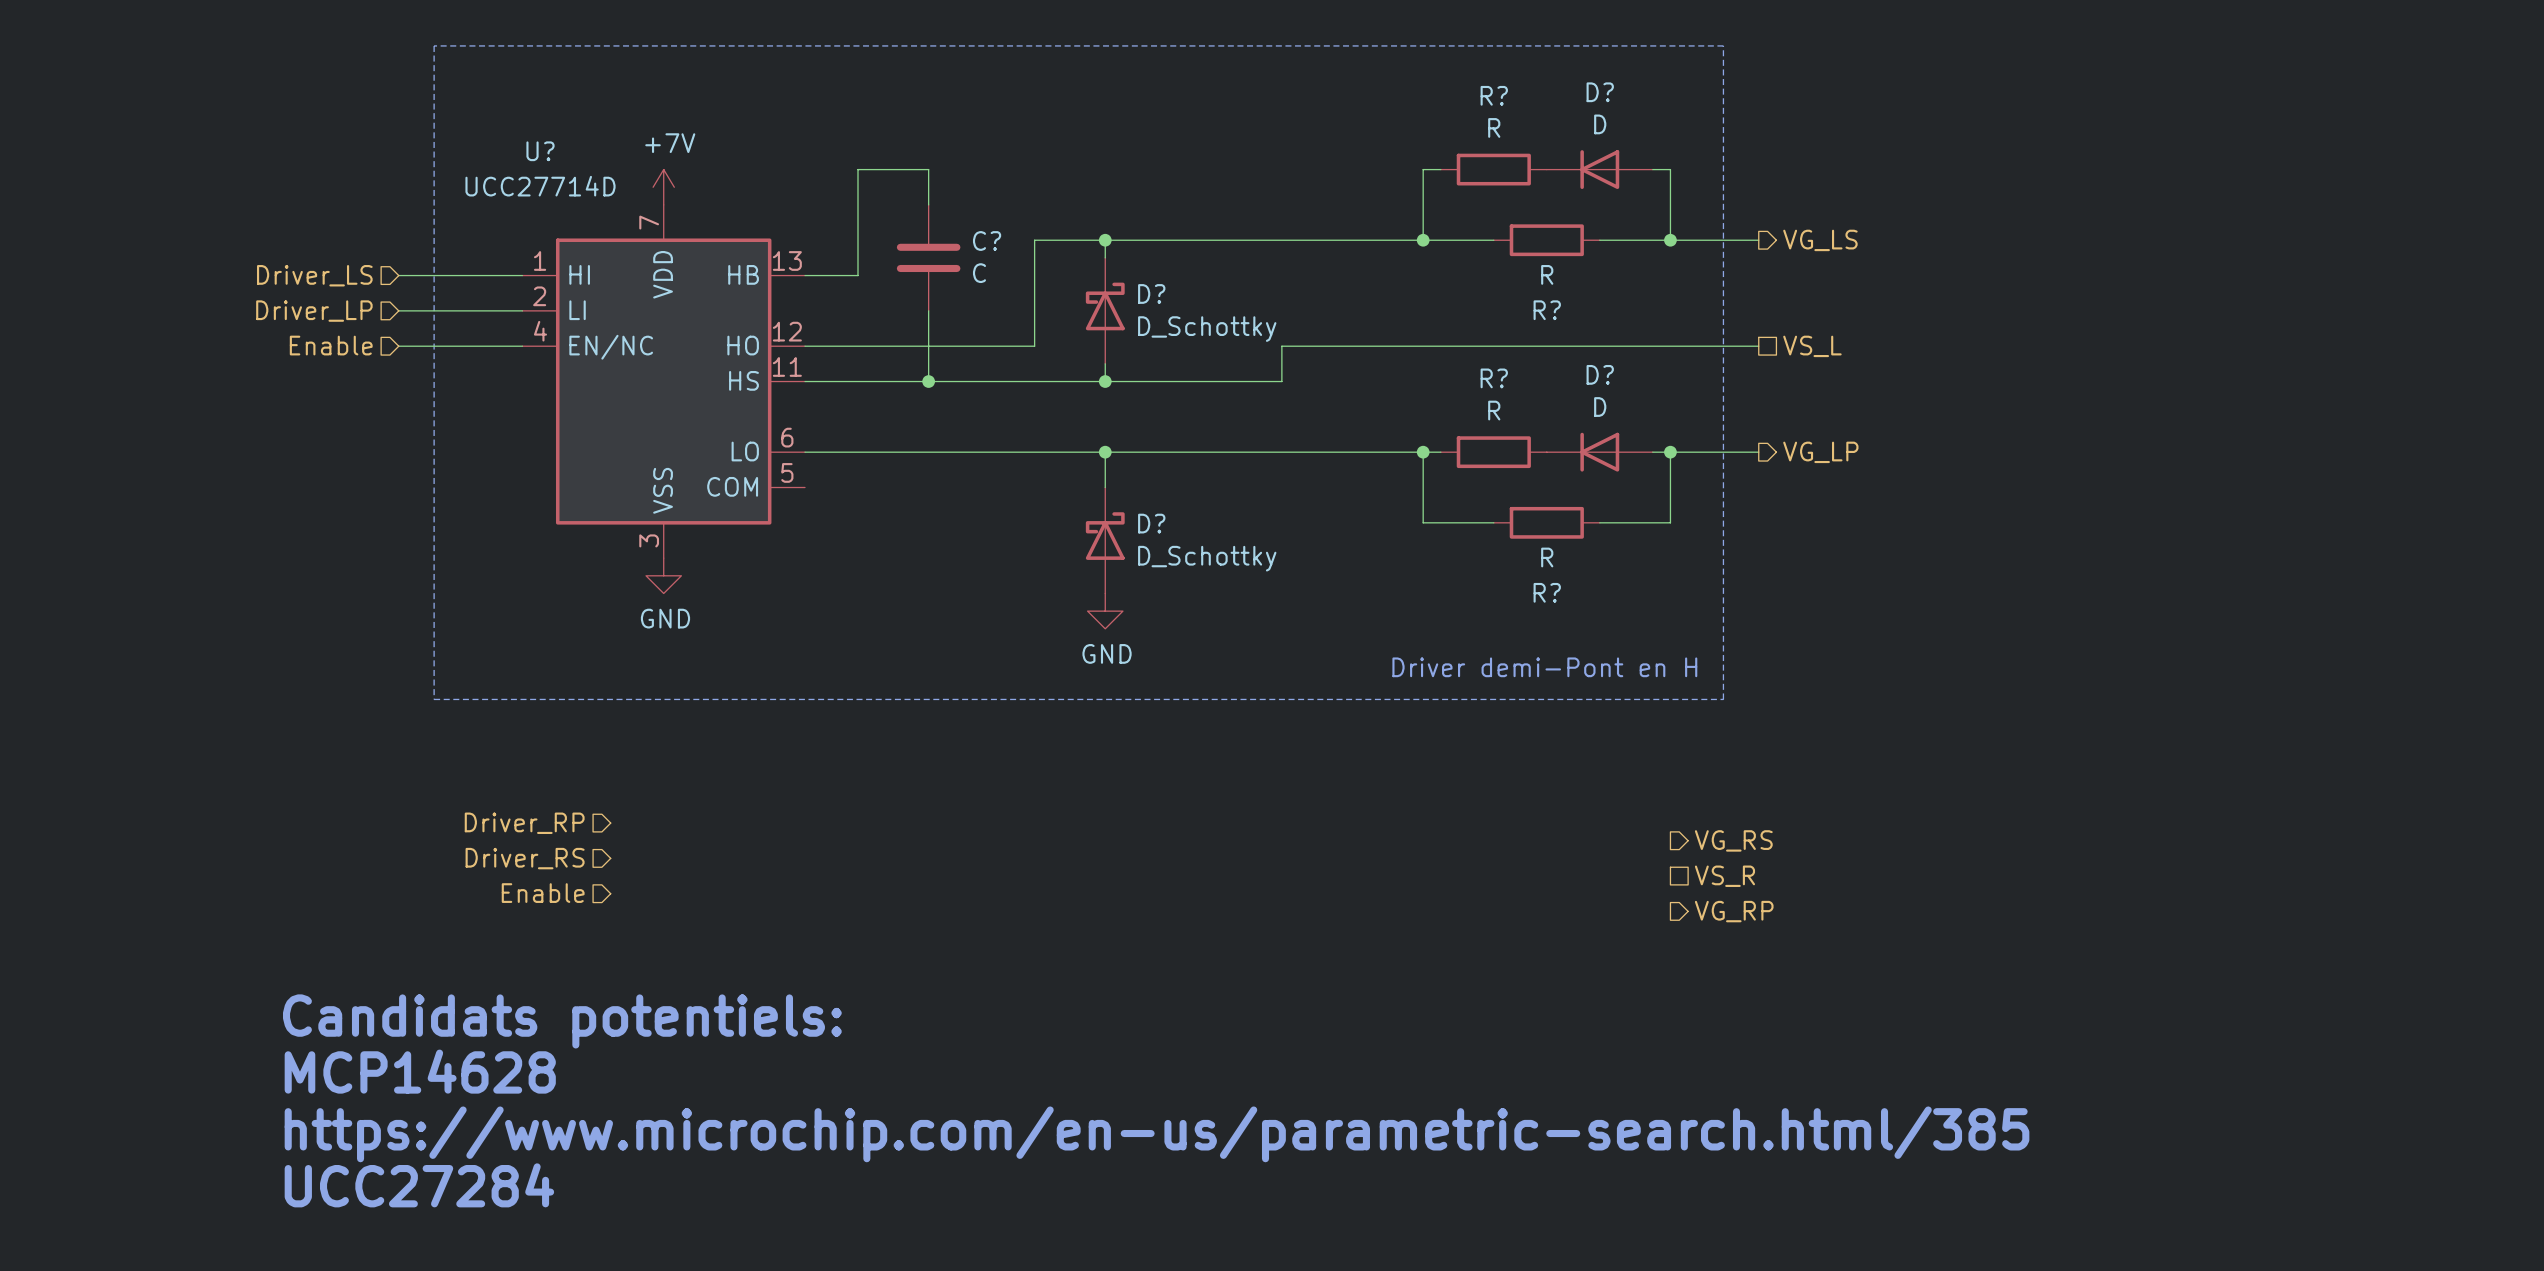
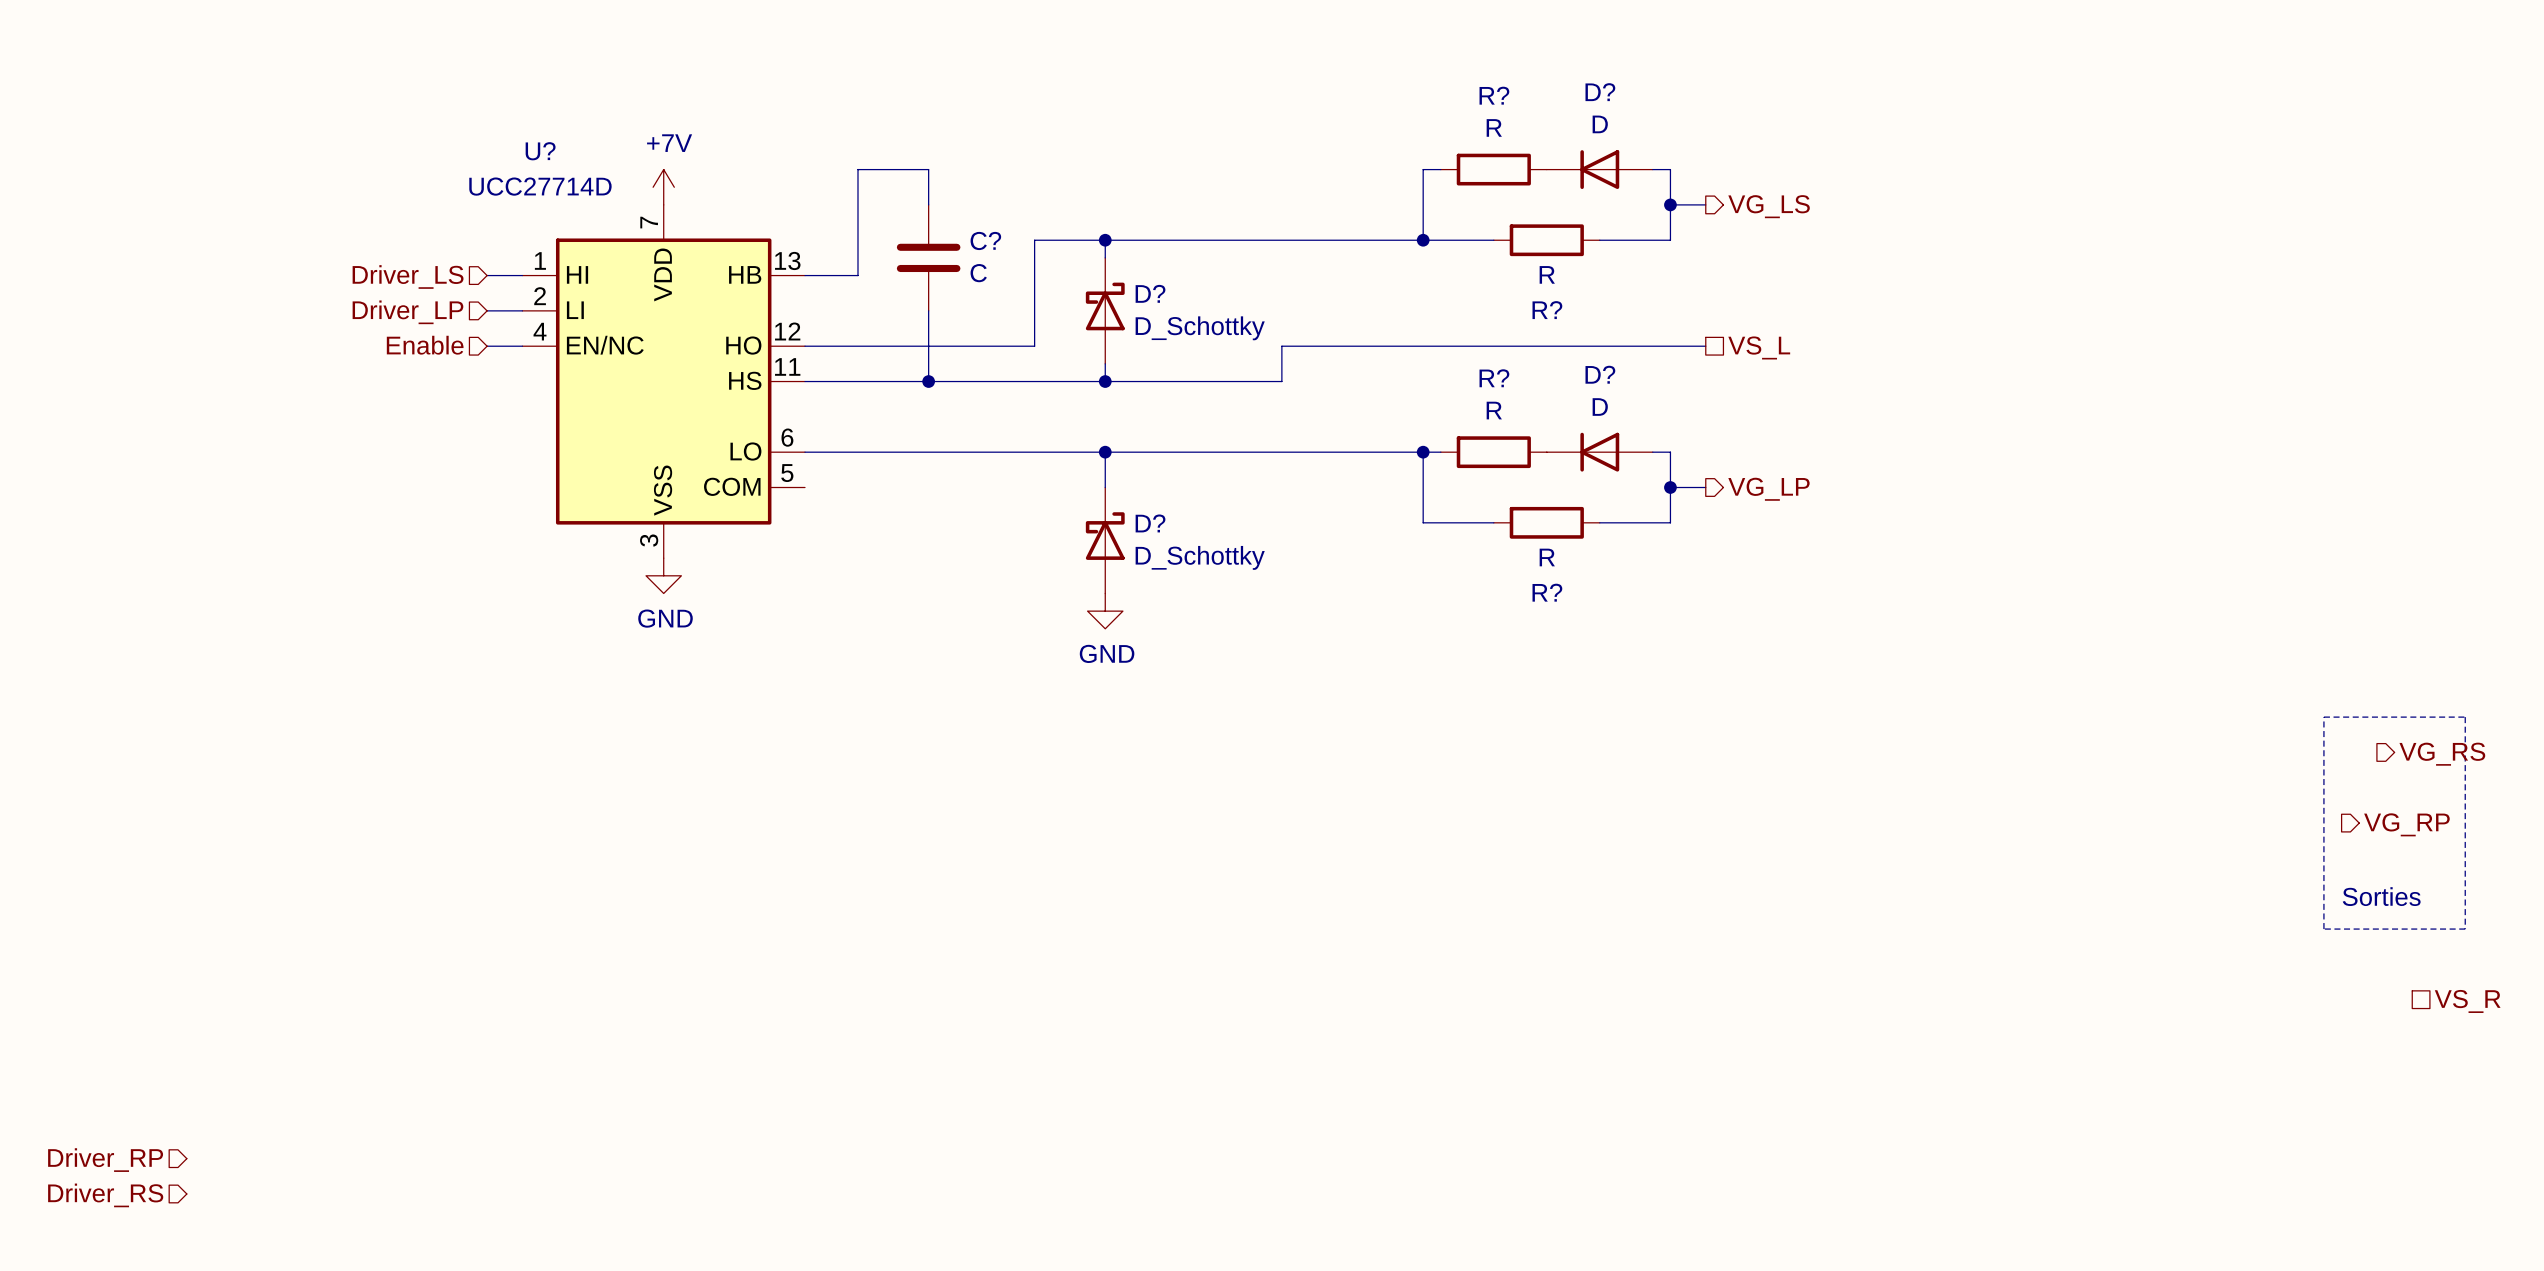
line: (434, 45) (434, 699) (1723, 699) (1723, 45) (434, 45) -> none
wire: none -> (1670, 204) (1705, 204)
wire: (1670, 240) (1758, 240) -> none
junction position: (1670, 240) -> (1670, 204)
hierarchical label position: VG_LS (1820, 240) -> VG_LS (1769, 206)
hierarchical label position: Driver_LS (314, 275) -> Driver_LS (408, 276)
wire: (398, 275) (487, 275) -> none
wire: (398, 310) (487, 310) -> none
hierarchical label position: Driver_LP (314, 311) -> Driver_LP (407, 312)
hierarchical label position: Enable (331, 345) -> Enable (425, 345)
wire: (398, 346) (487, 346) -> none
wire: (1705, 346) (1758, 346) -> none
hierarchical label position: VS_L (1812, 346) -> VS_L (1759, 347)
wire: (1670, 452) (1758, 452) -> none
junction position: (1670, 452) -> (1670, 487)
hierarchical label position: VG_LP (1820, 452) -> VG_LP (1768, 489)
wire: none -> (1670, 487) (1705, 487)
text: Driver demi-Pont en H (1544, 667) -> none
line: none -> (2323, 717) (2465, 717) (2465, 929) (2323, 929) (2323, 717)
hierarchical label: none -> VG_RS (2442, 754)
hierarchical label: Driver_RP (524, 823) -> none
hierarchical label: none -> VG_RP (2406, 824)
hierarchical label: VG_RS (1733, 840) -> none
hierarchical label: Driver_RS (525, 858) -> none
hierarchical label: VS_R (1724, 876) -> none
hierarchical label: Enable (543, 893) -> none
text: none -> Sorties (2381, 896)
hierarchical label: VG_RP (1734, 911) -> none
hierarchical label: none -> VS_R (2467, 1001)
text: Candidats potentiels: (562, 1021) -> none
text: MCP14628 (420, 1071) -> none
text: https://www.microchip.com/en-us/parametric-search.html/385 (1157, 1134) -> none
hierarchical label: none -> Driver_RP (105, 1160)
text: UCC27284 (419, 1185) -> none
hierarchical label: none -> Driver_RS (105, 1195)

